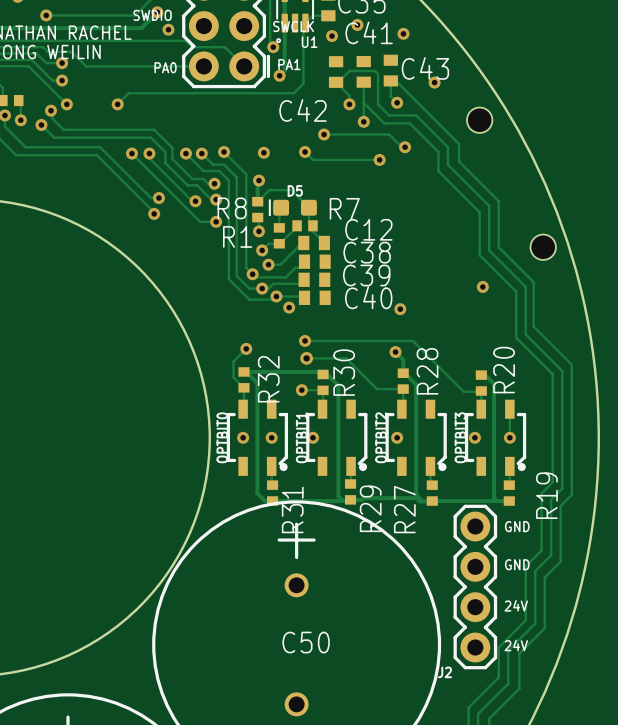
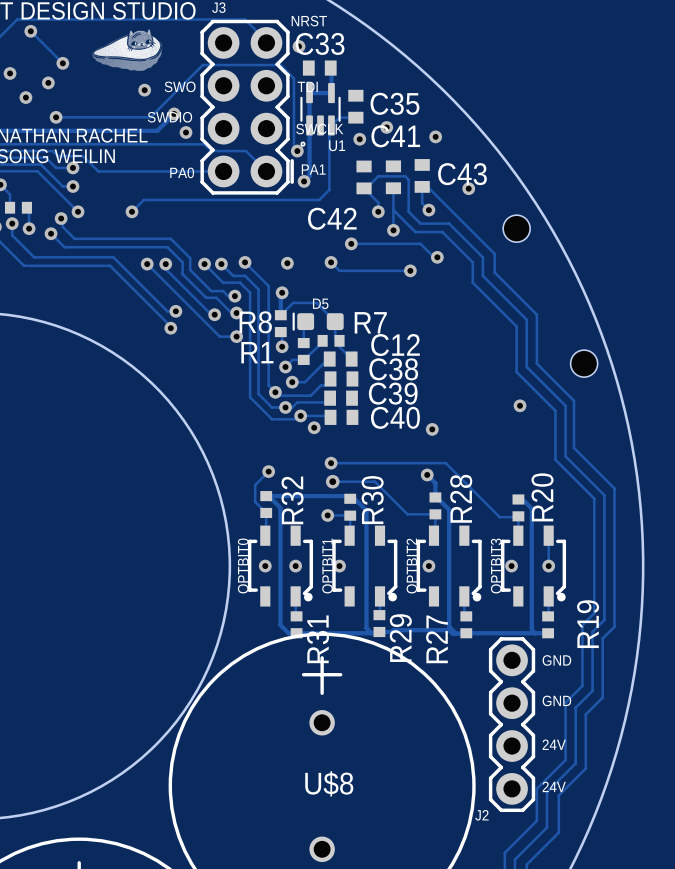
C50 name: C50 (306, 642) -> U$8 (329, 783)

